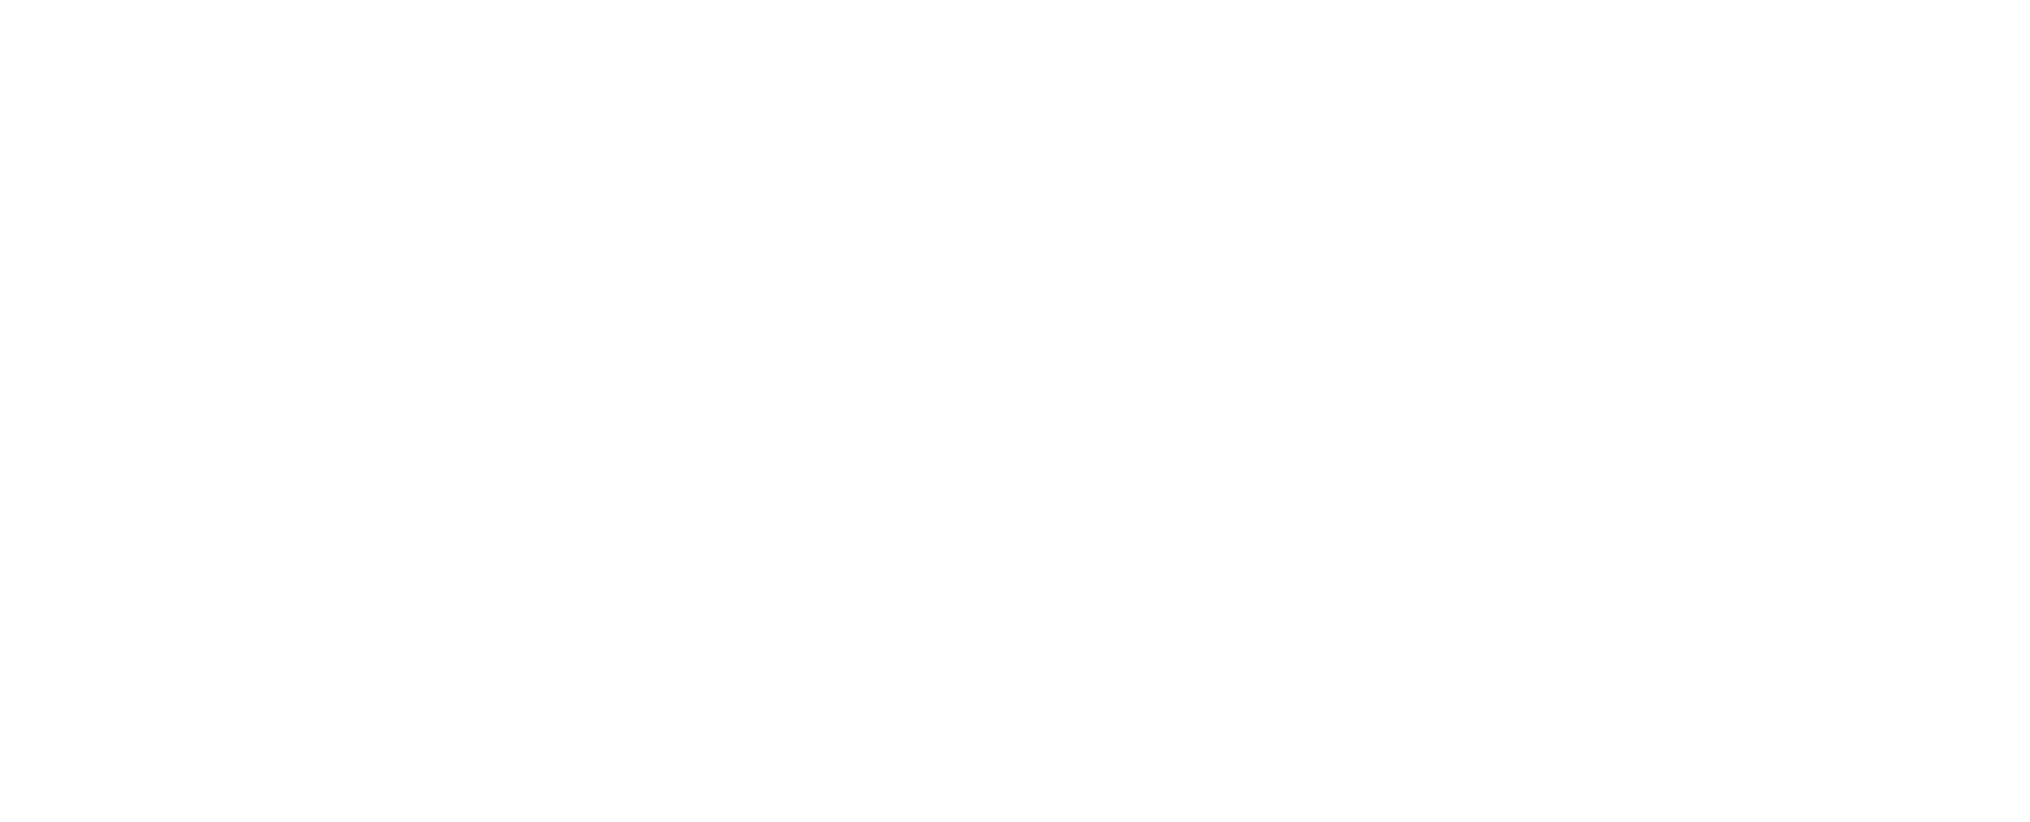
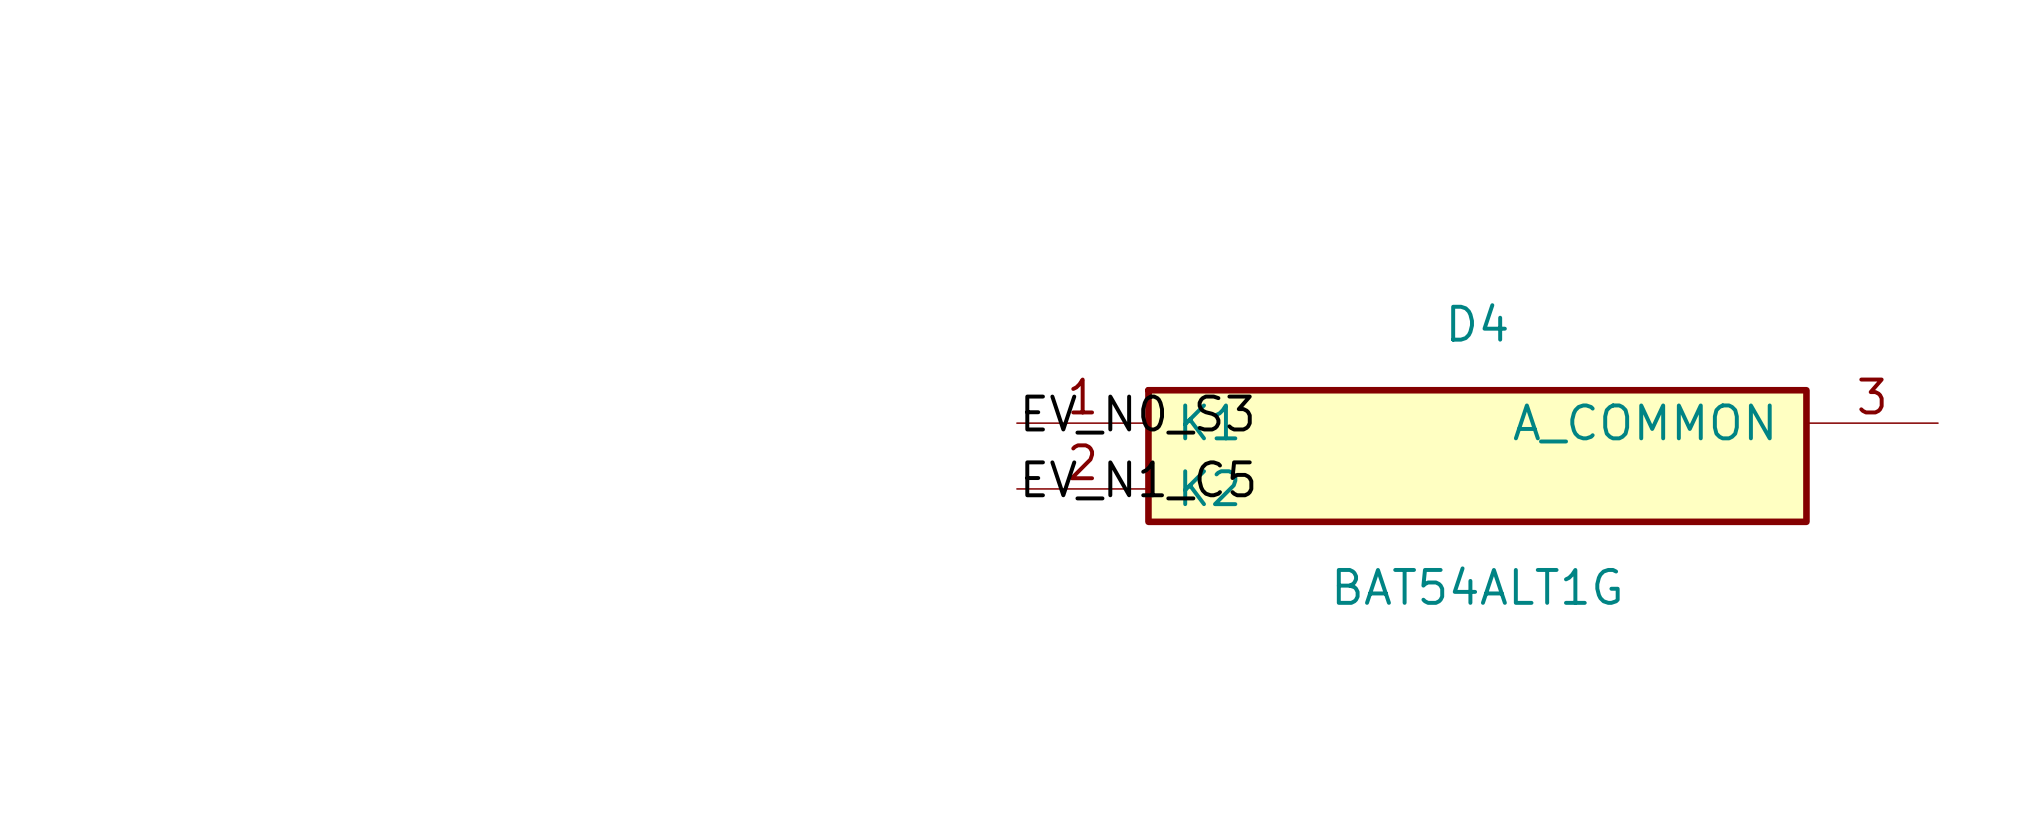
label: none -> EV_N0_S3 (1138, 414)
D4: none -> BAT54ALT1G (1477, 456)
label: none -> EV_N1_C5 (1139, 480)

